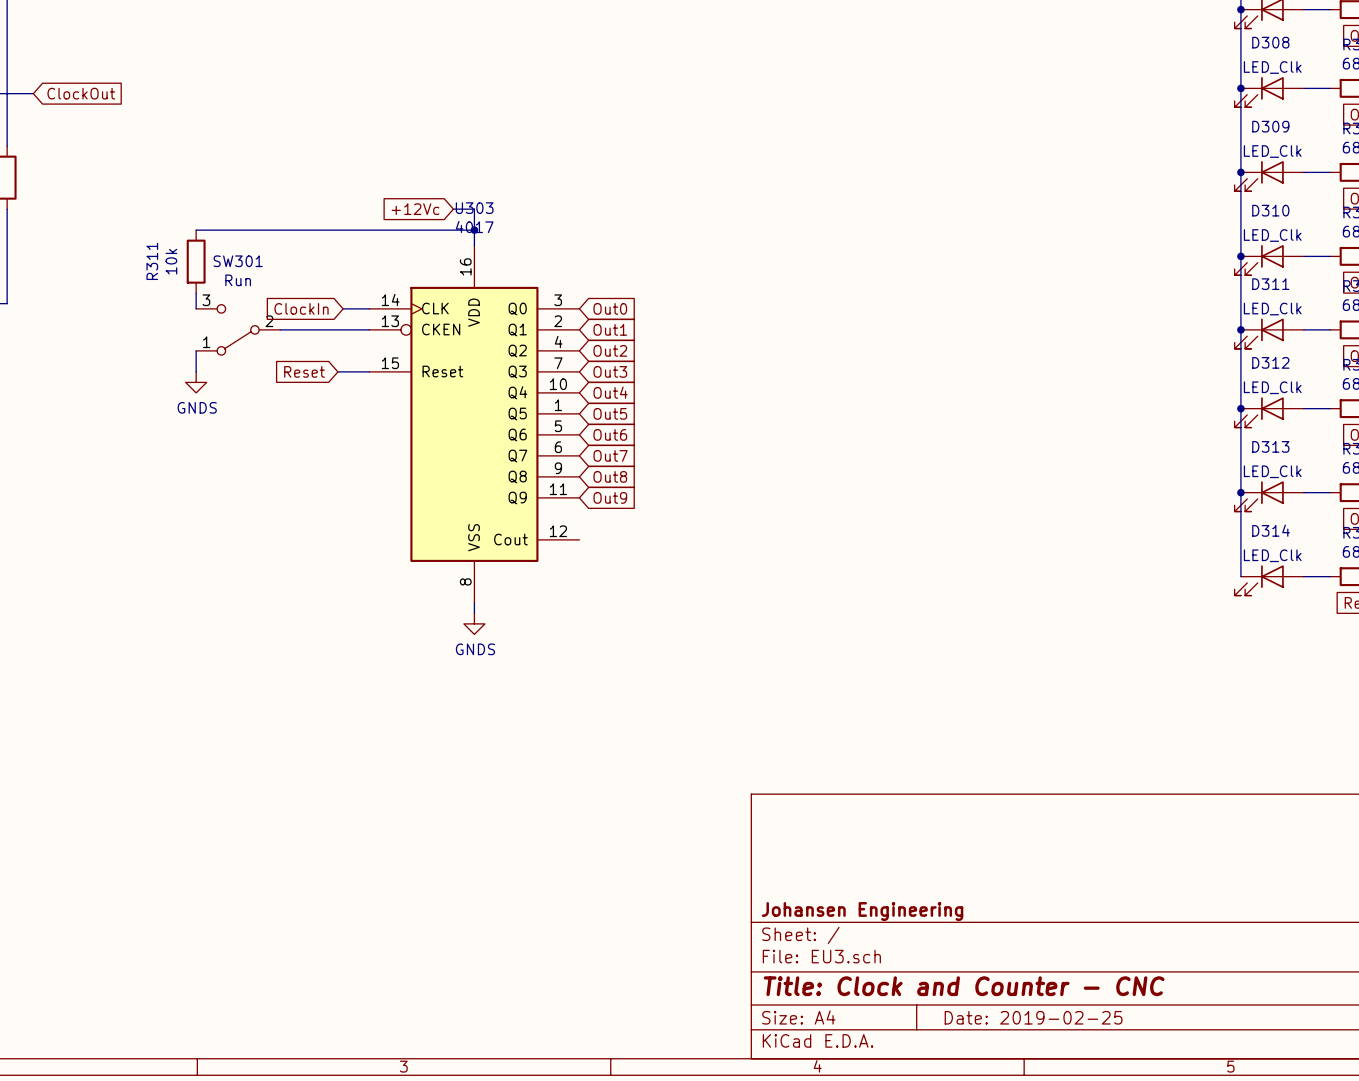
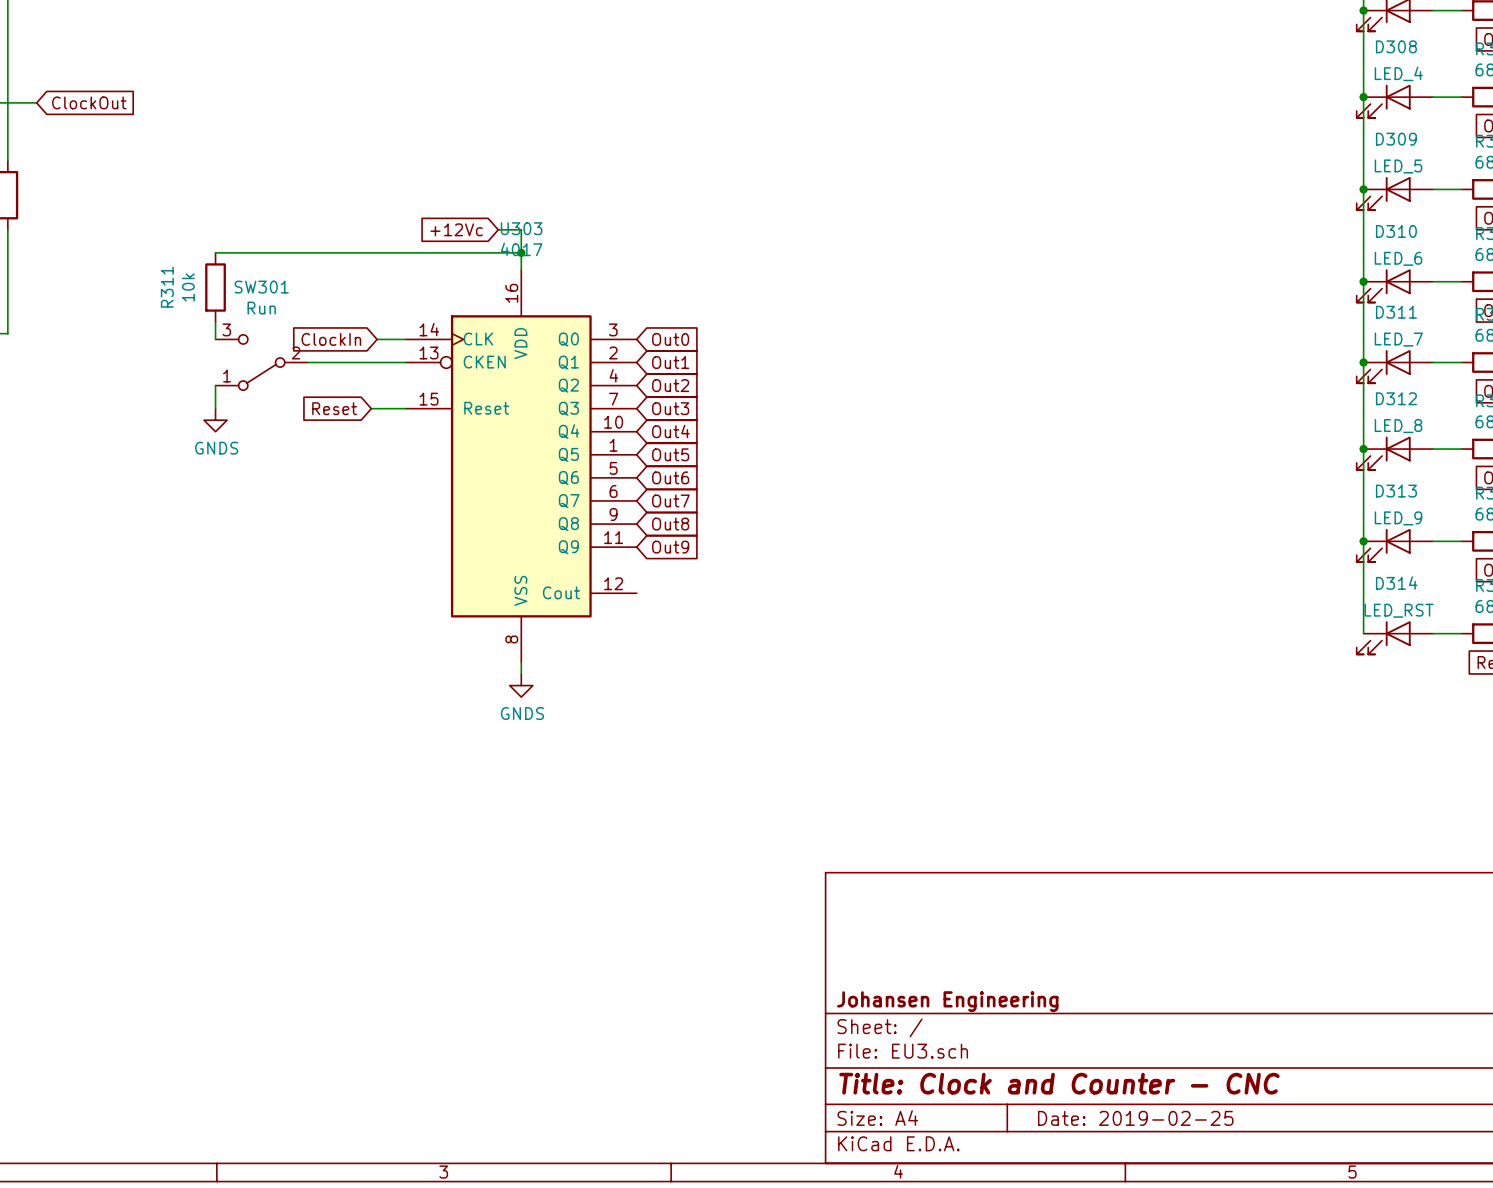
D308 value: LED_Clk (1272, 67) -> LED_4 (1398, 73)
D309 value: LED_Clk (1272, 151) -> LED_5 (1398, 166)
D310 value: LED_Clk (1272, 235) -> LED_6 (1398, 258)
D311 value: LED_Clk (1272, 309) -> LED_7 (1398, 339)
D312 value: LED_Clk (1272, 387) -> LED_8 (1398, 426)
D313 value: LED_Clk (1272, 471) -> LED_9 (1398, 518)
D314 value: LED_Clk (1272, 555) -> LED_RST (1399, 610)

